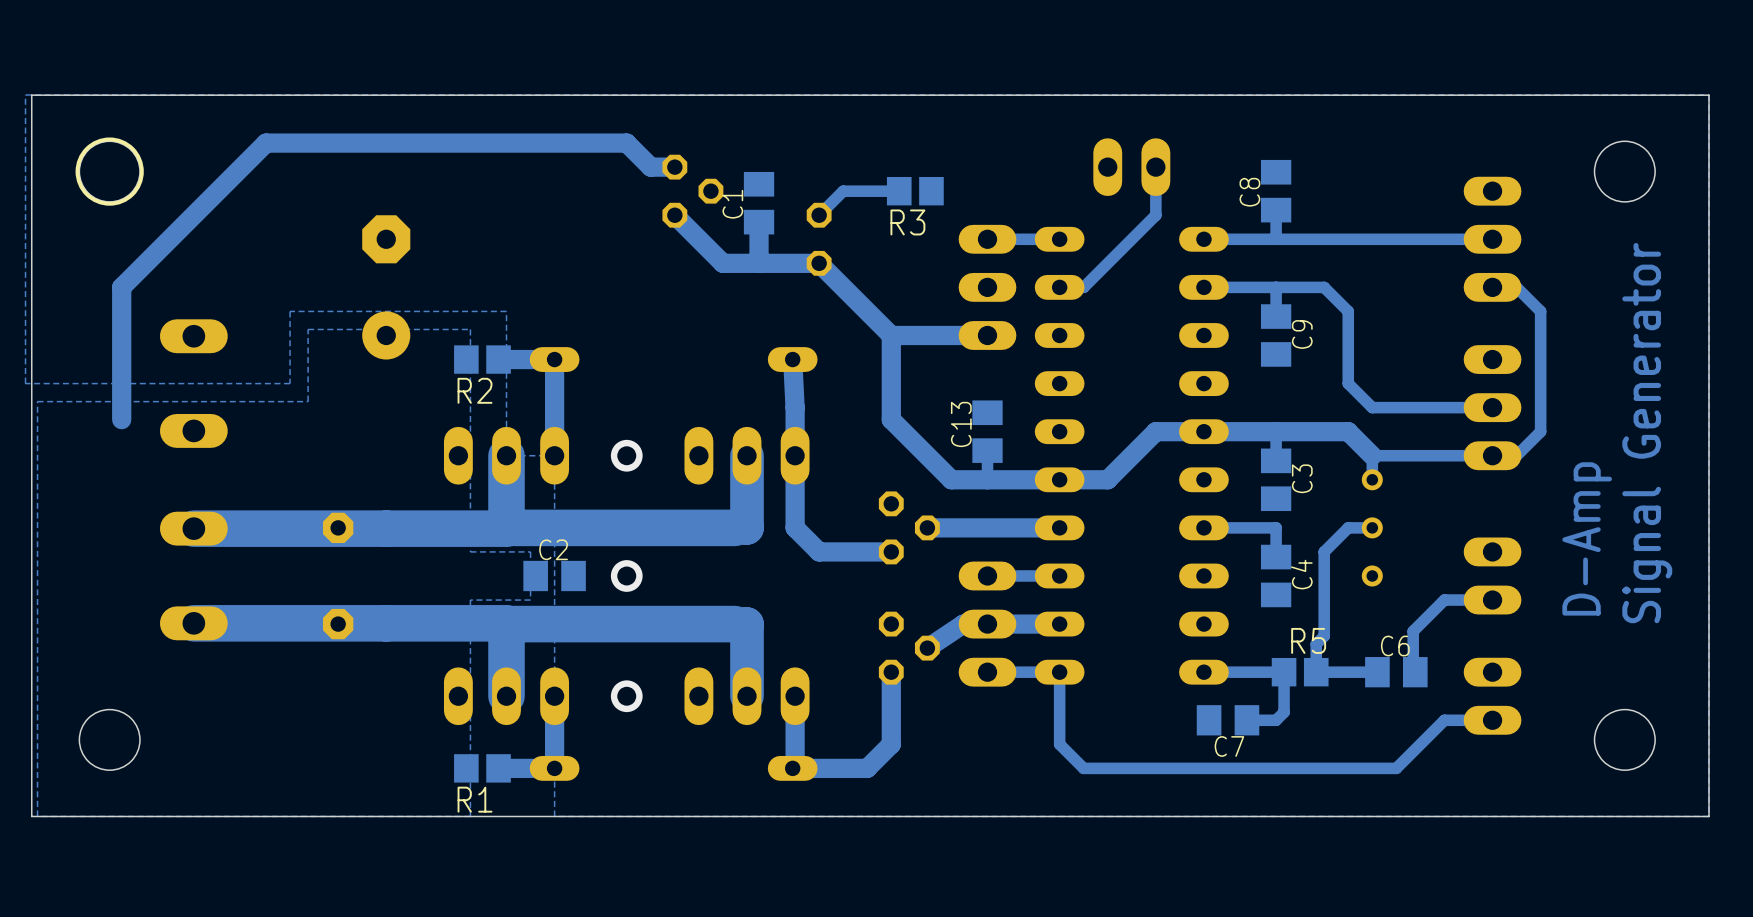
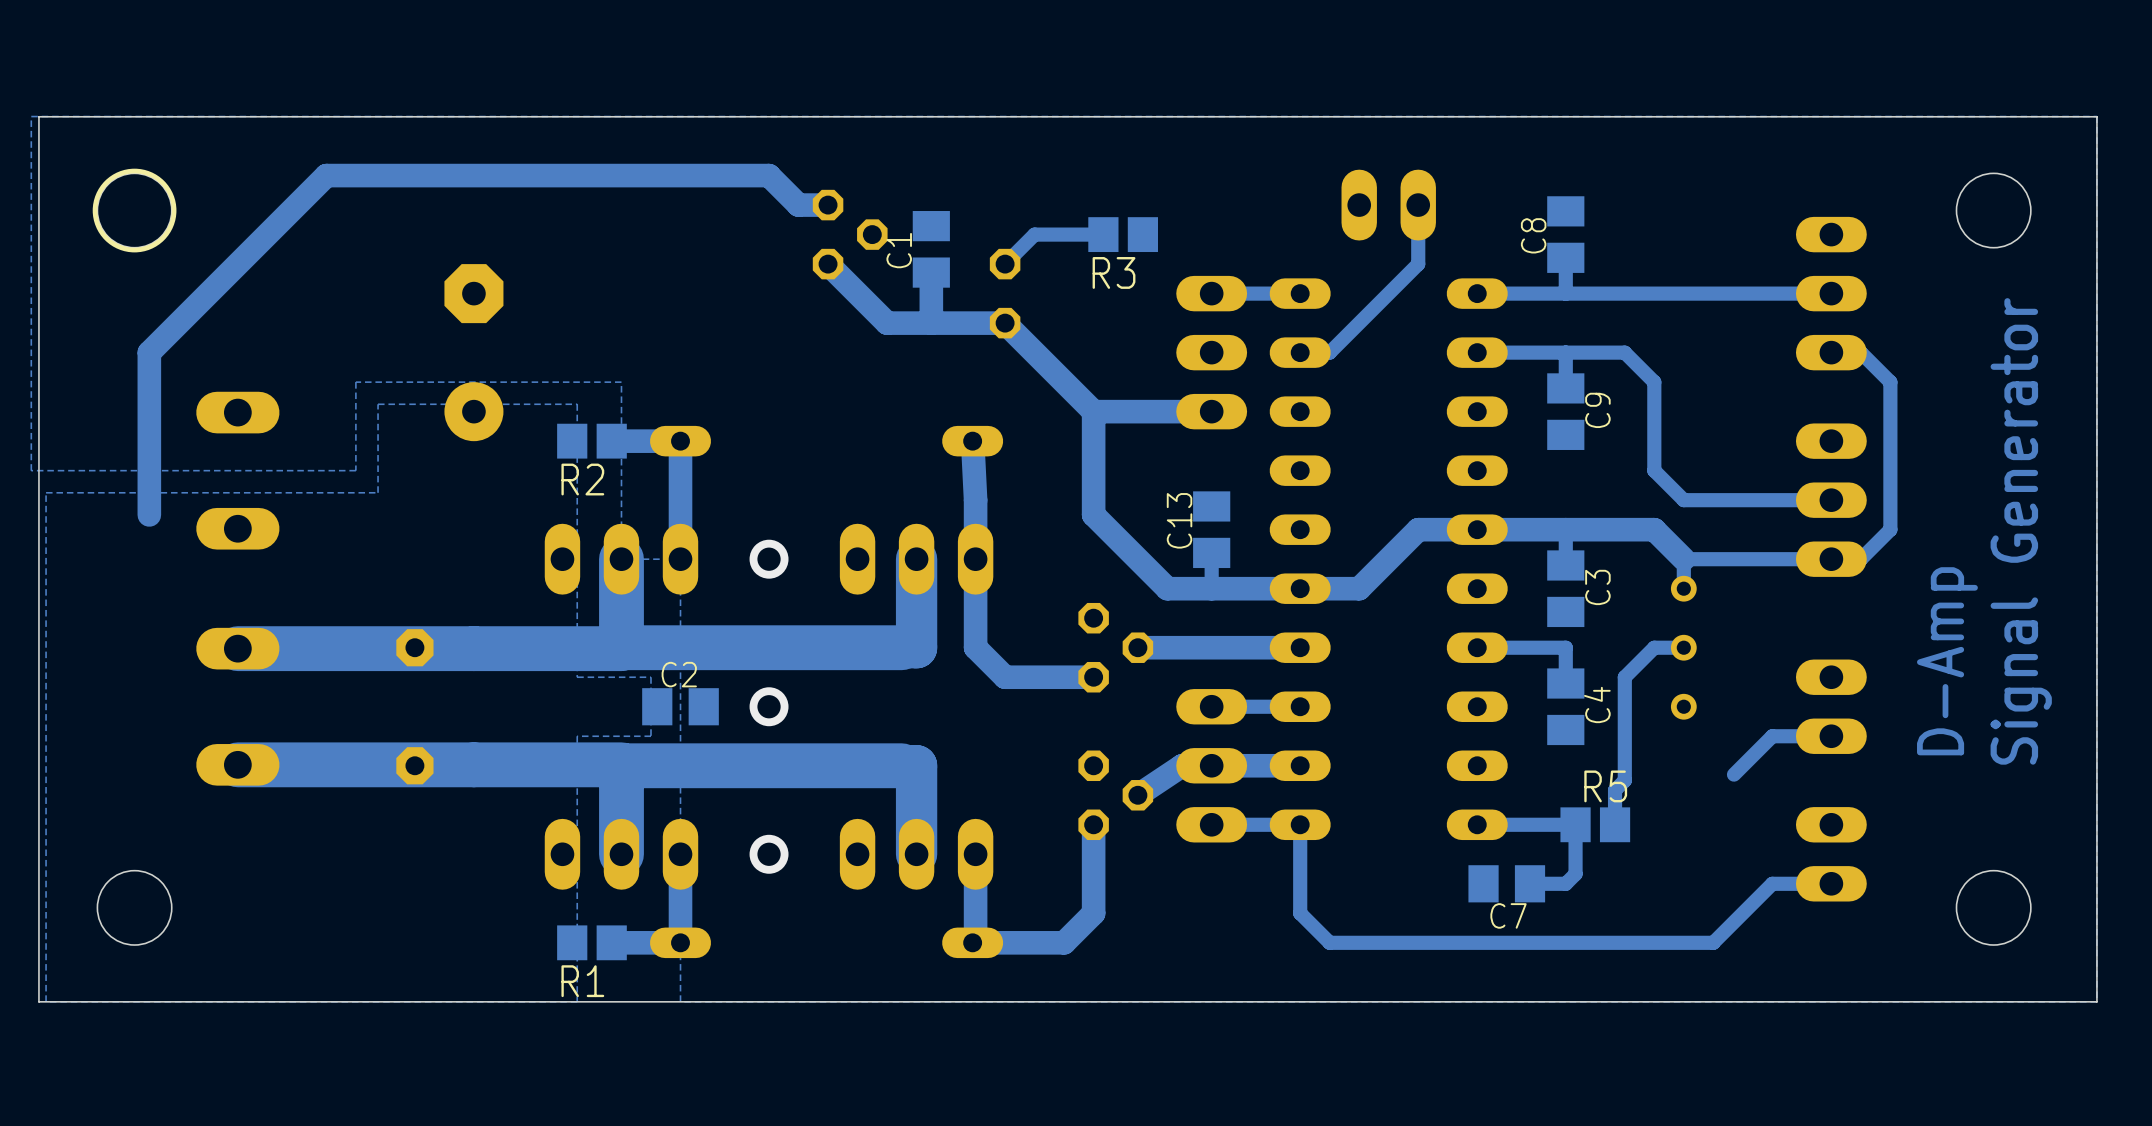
track: (1413, 631) (1413, 672) (1415, 672) -> none
track: (1377, 672) (1316, 672) -> none
C6: (1396, 672) -> none

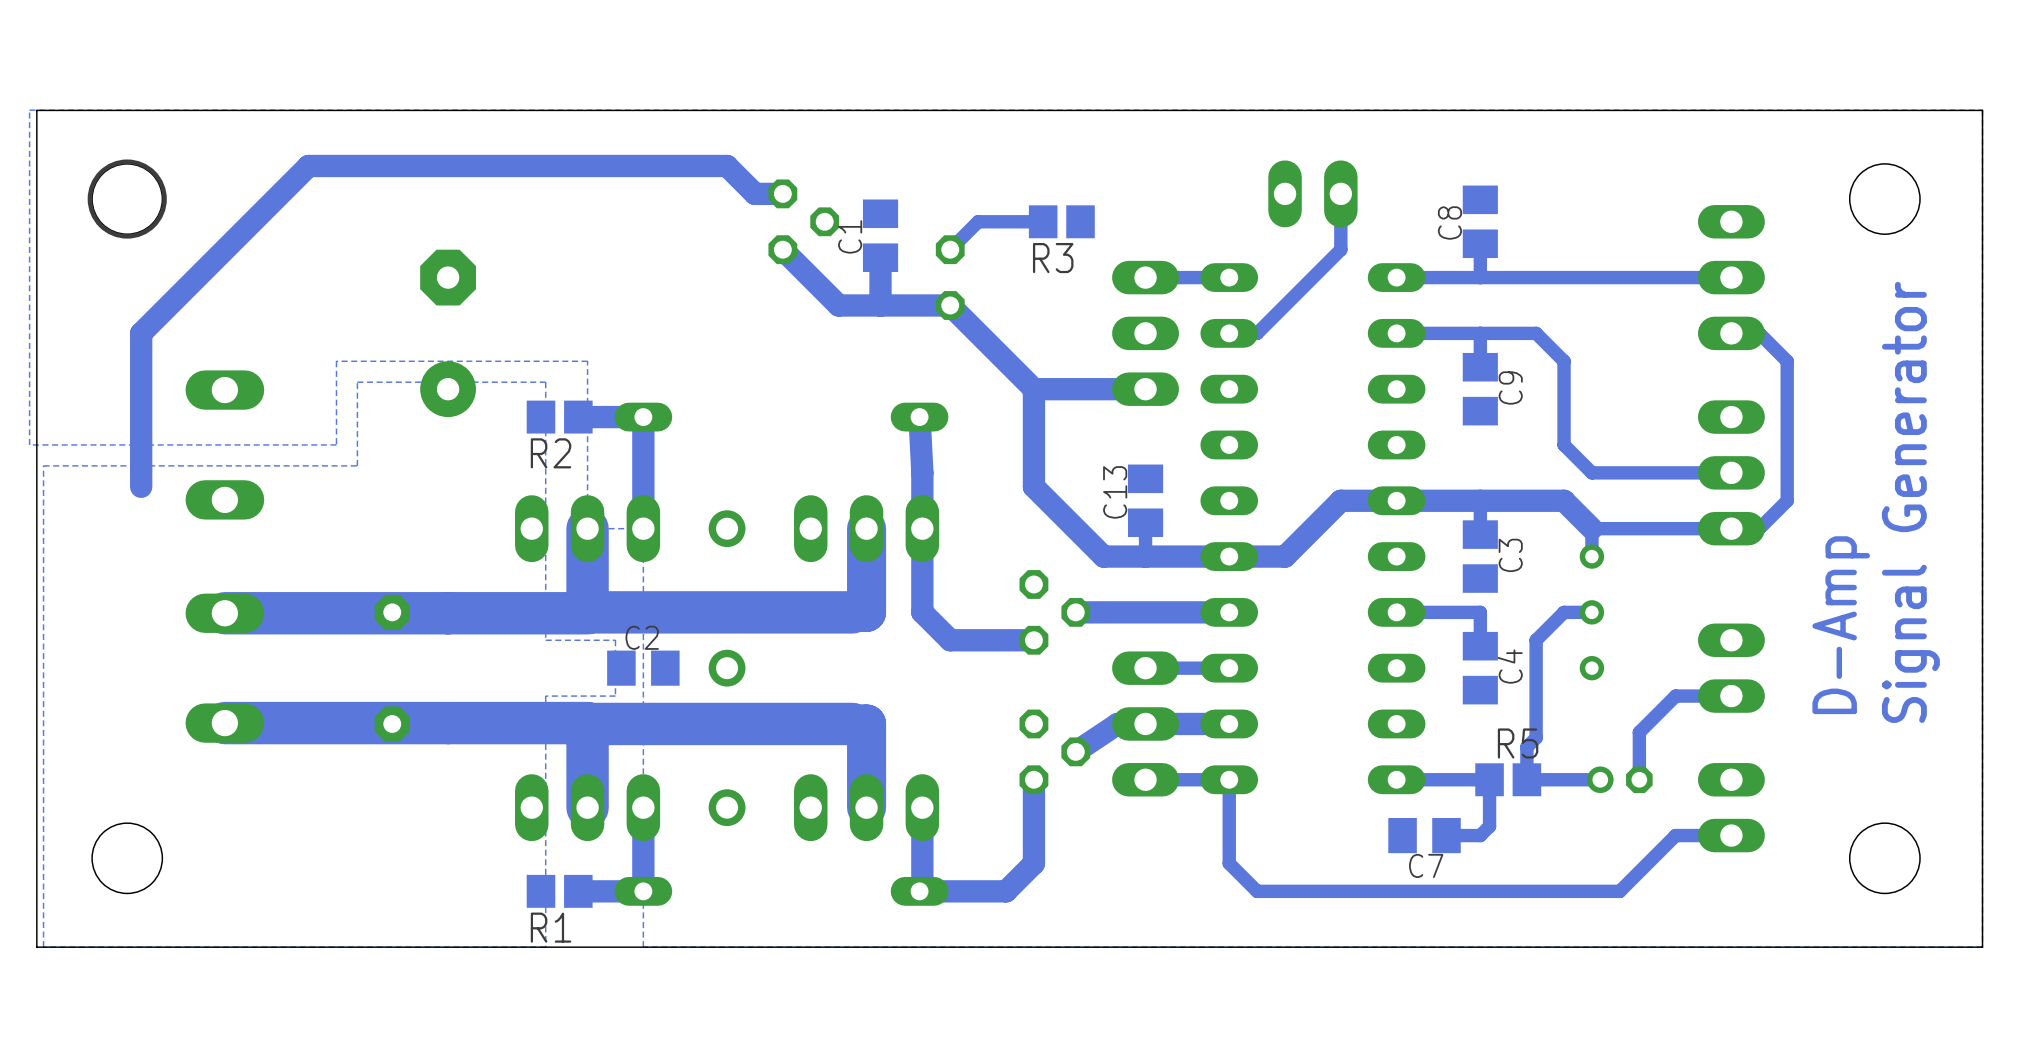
track: none -> (1639, 732) (1639, 779)
track: none -> (1600, 779) (1526, 779)
part: none -> (1619, 779)

